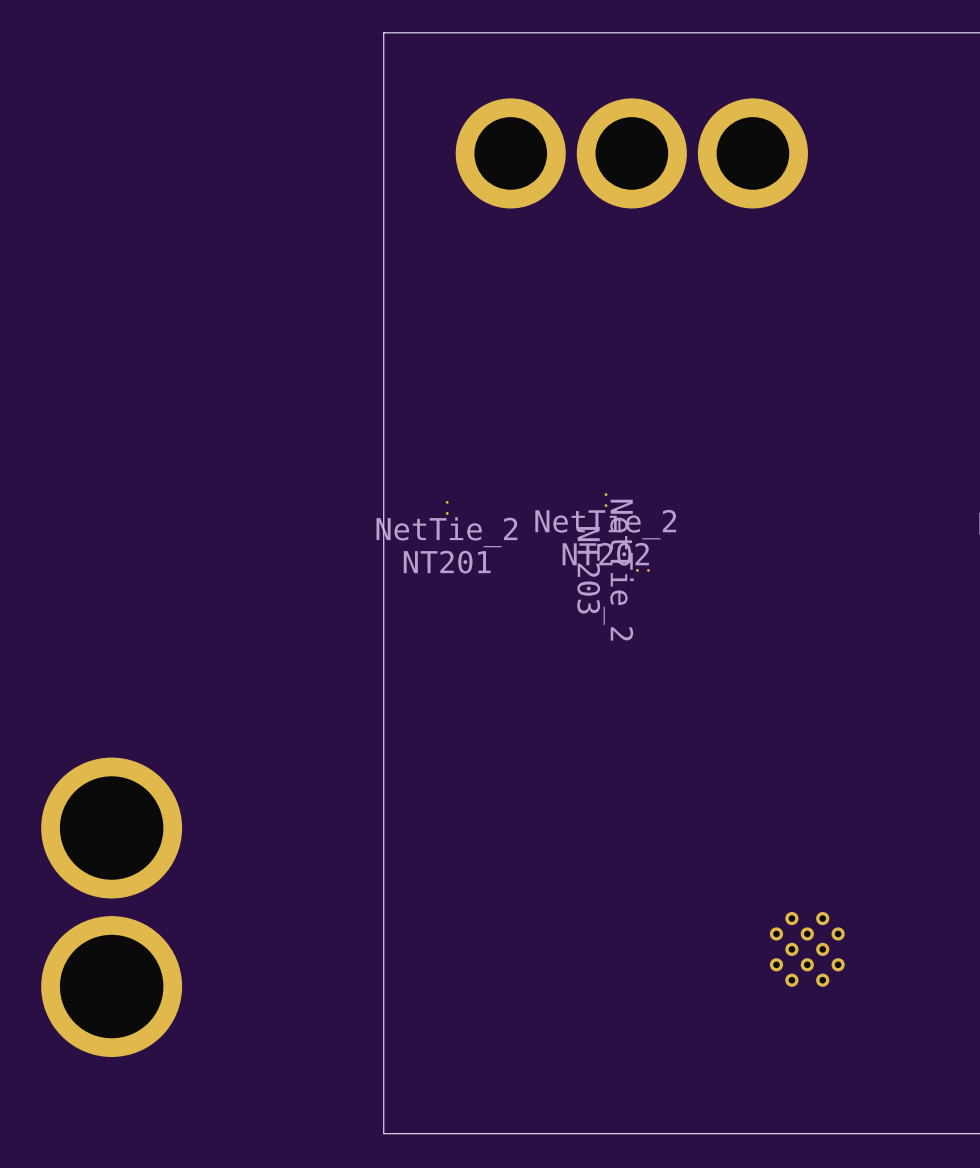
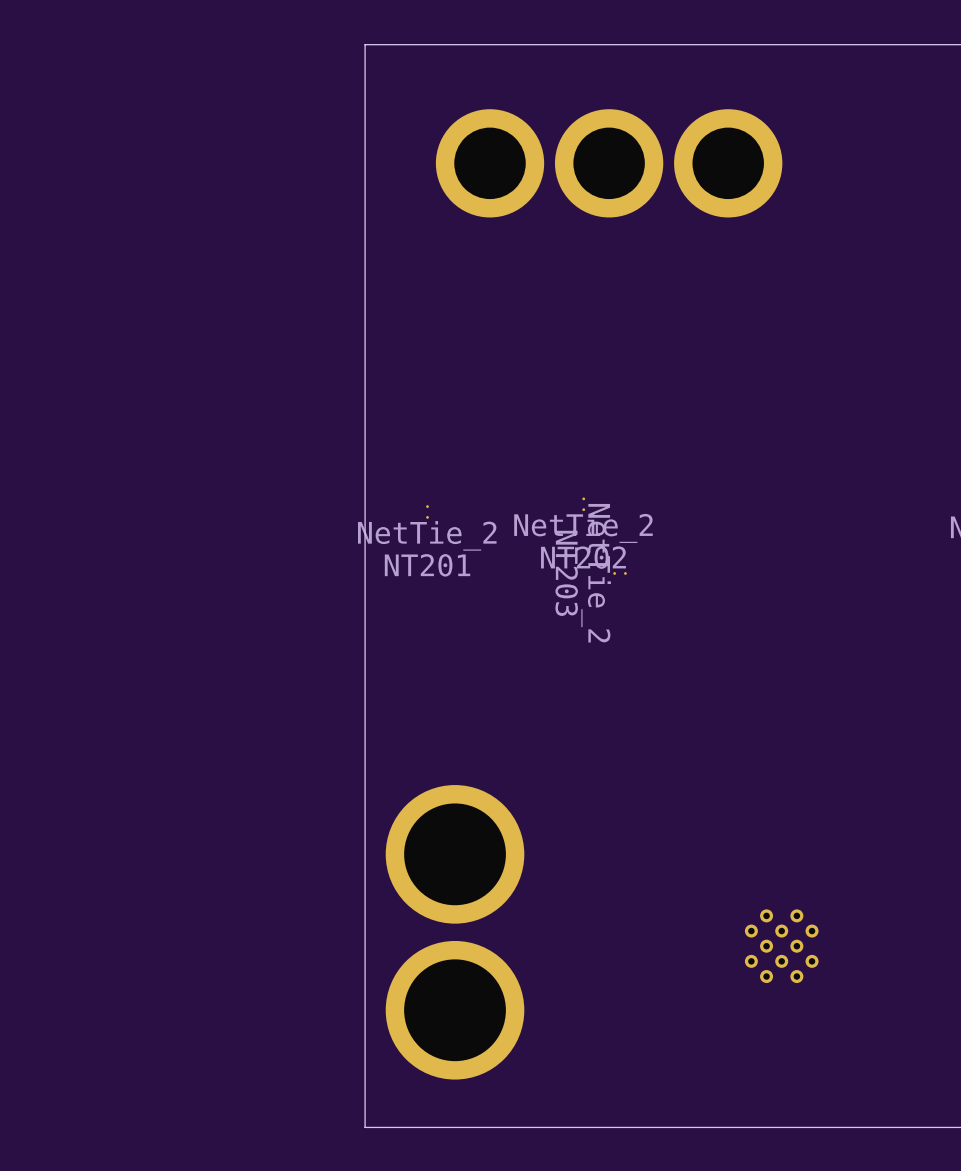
part position: (111, 907) -> (455, 932)

